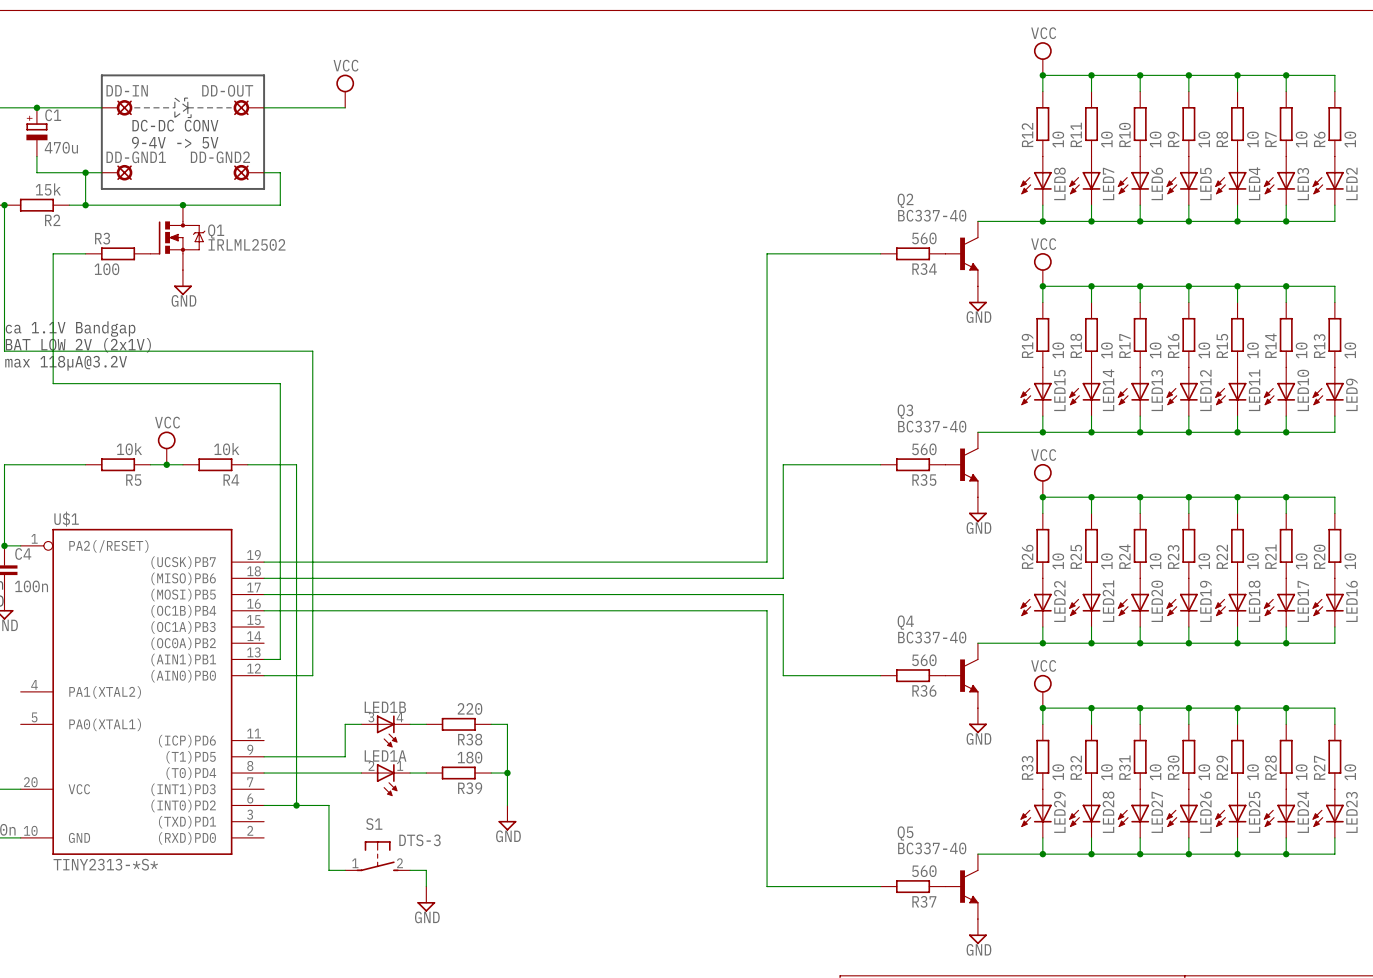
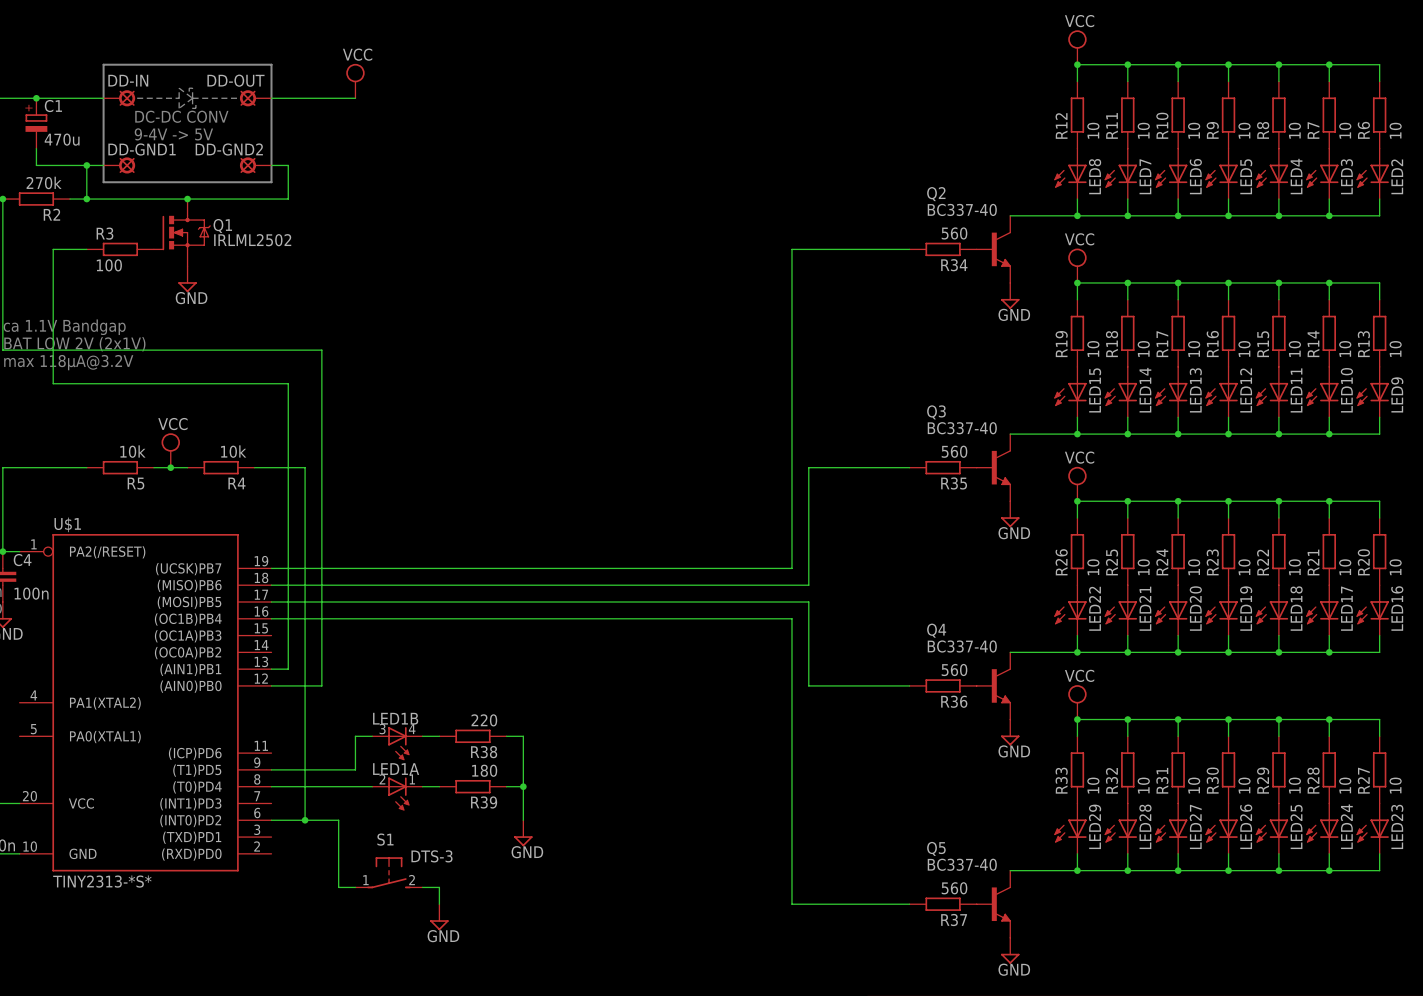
R2 value: 15k (48, 189) -> 270k (44, 182)

